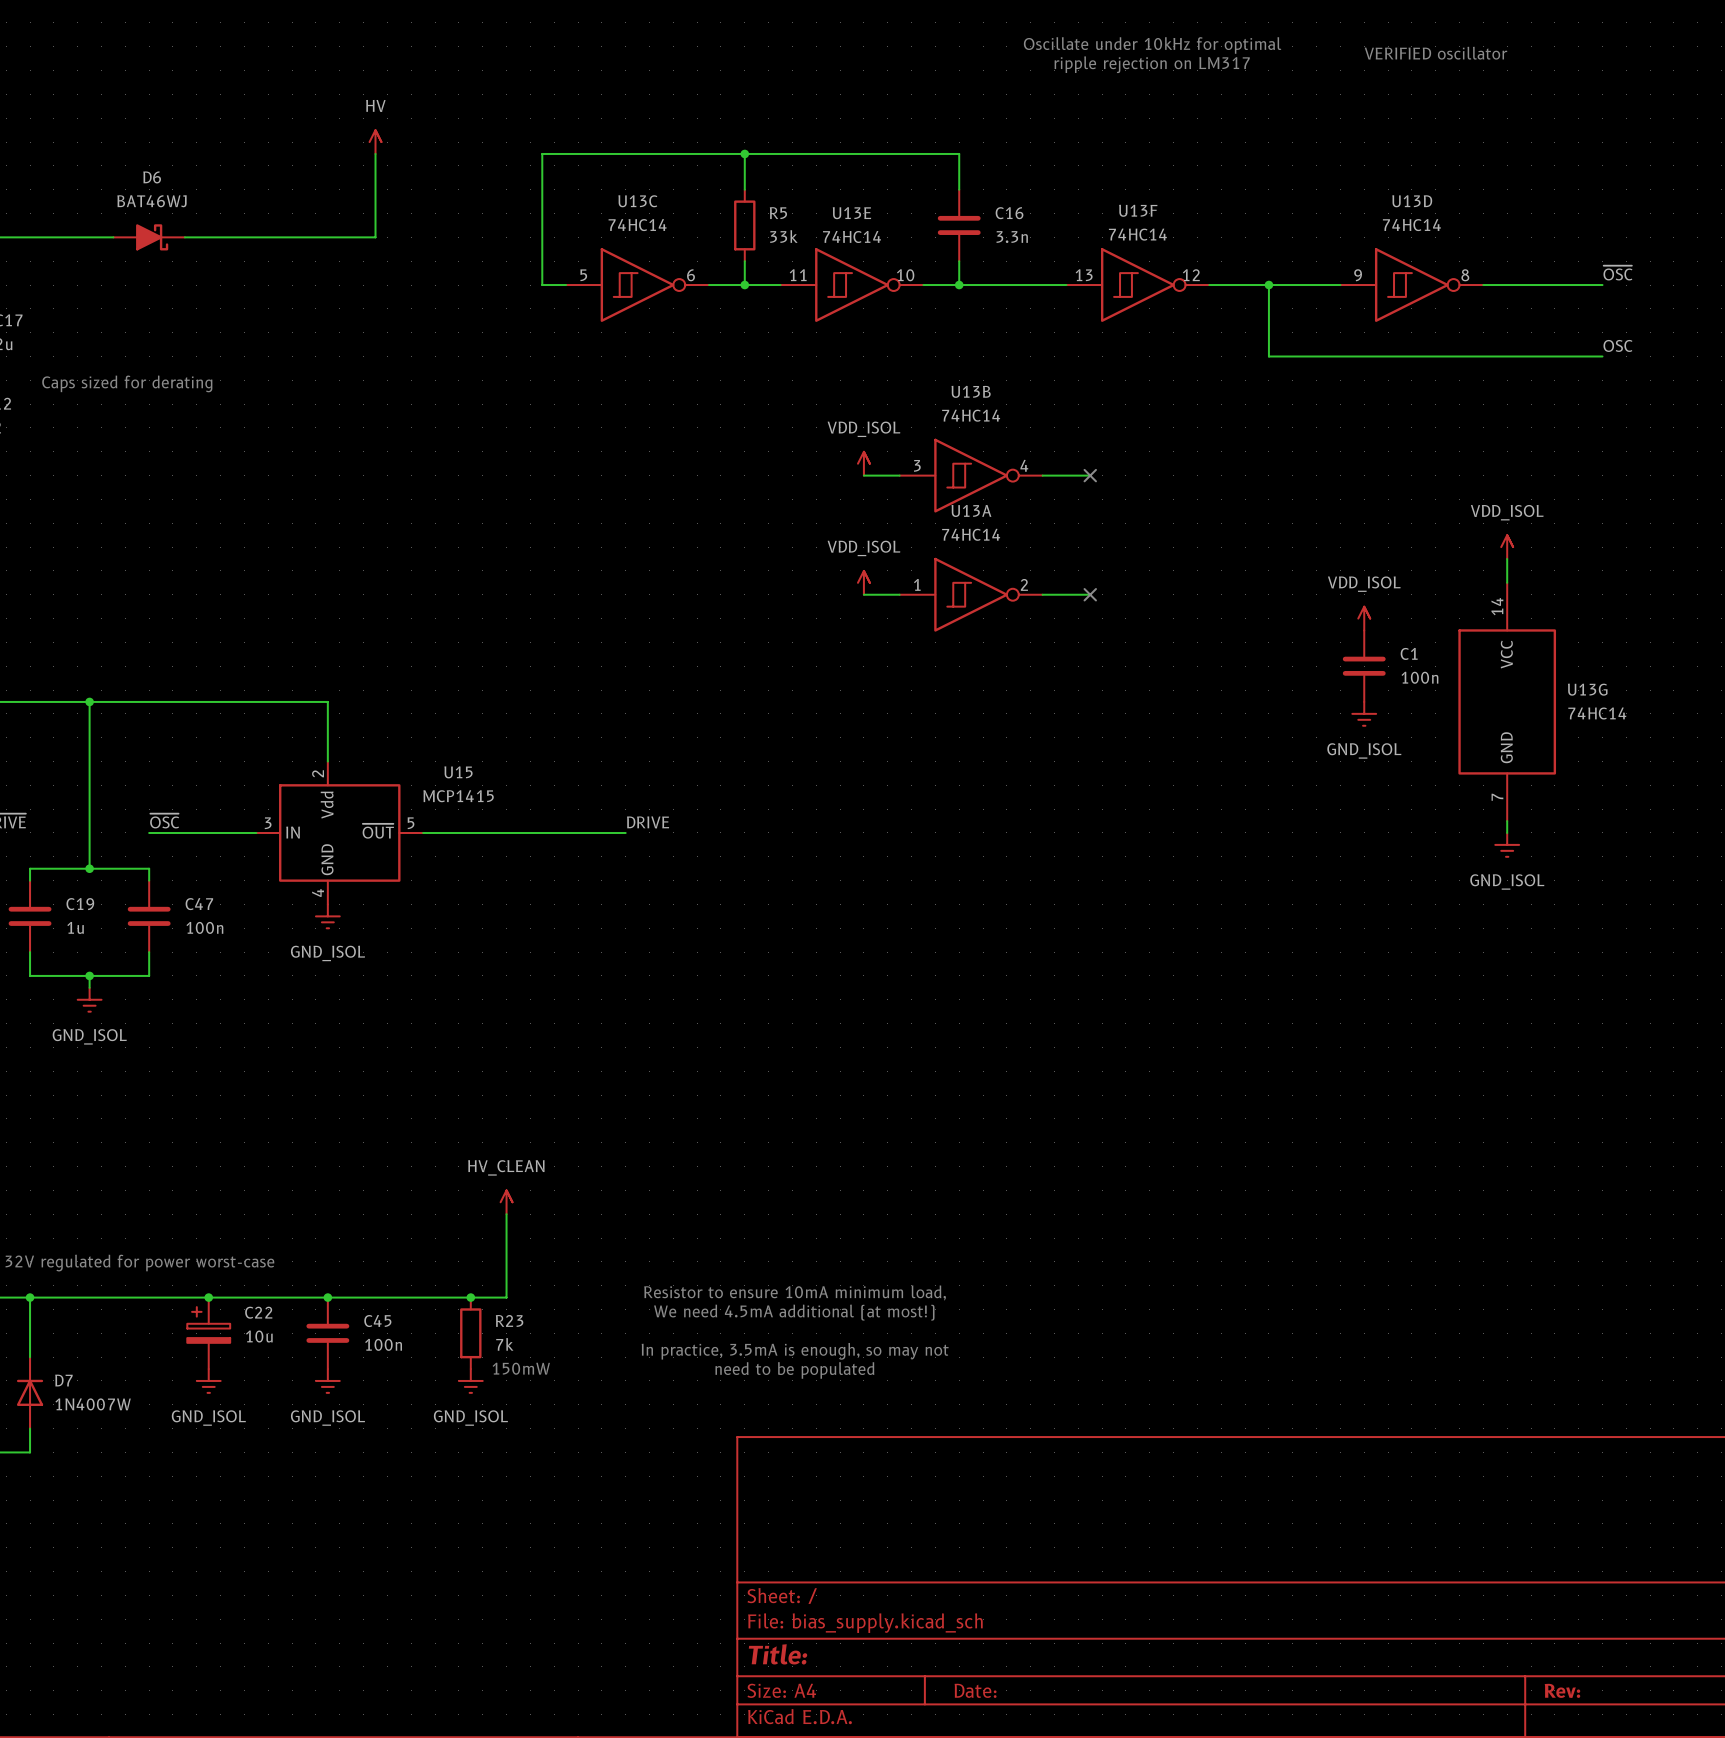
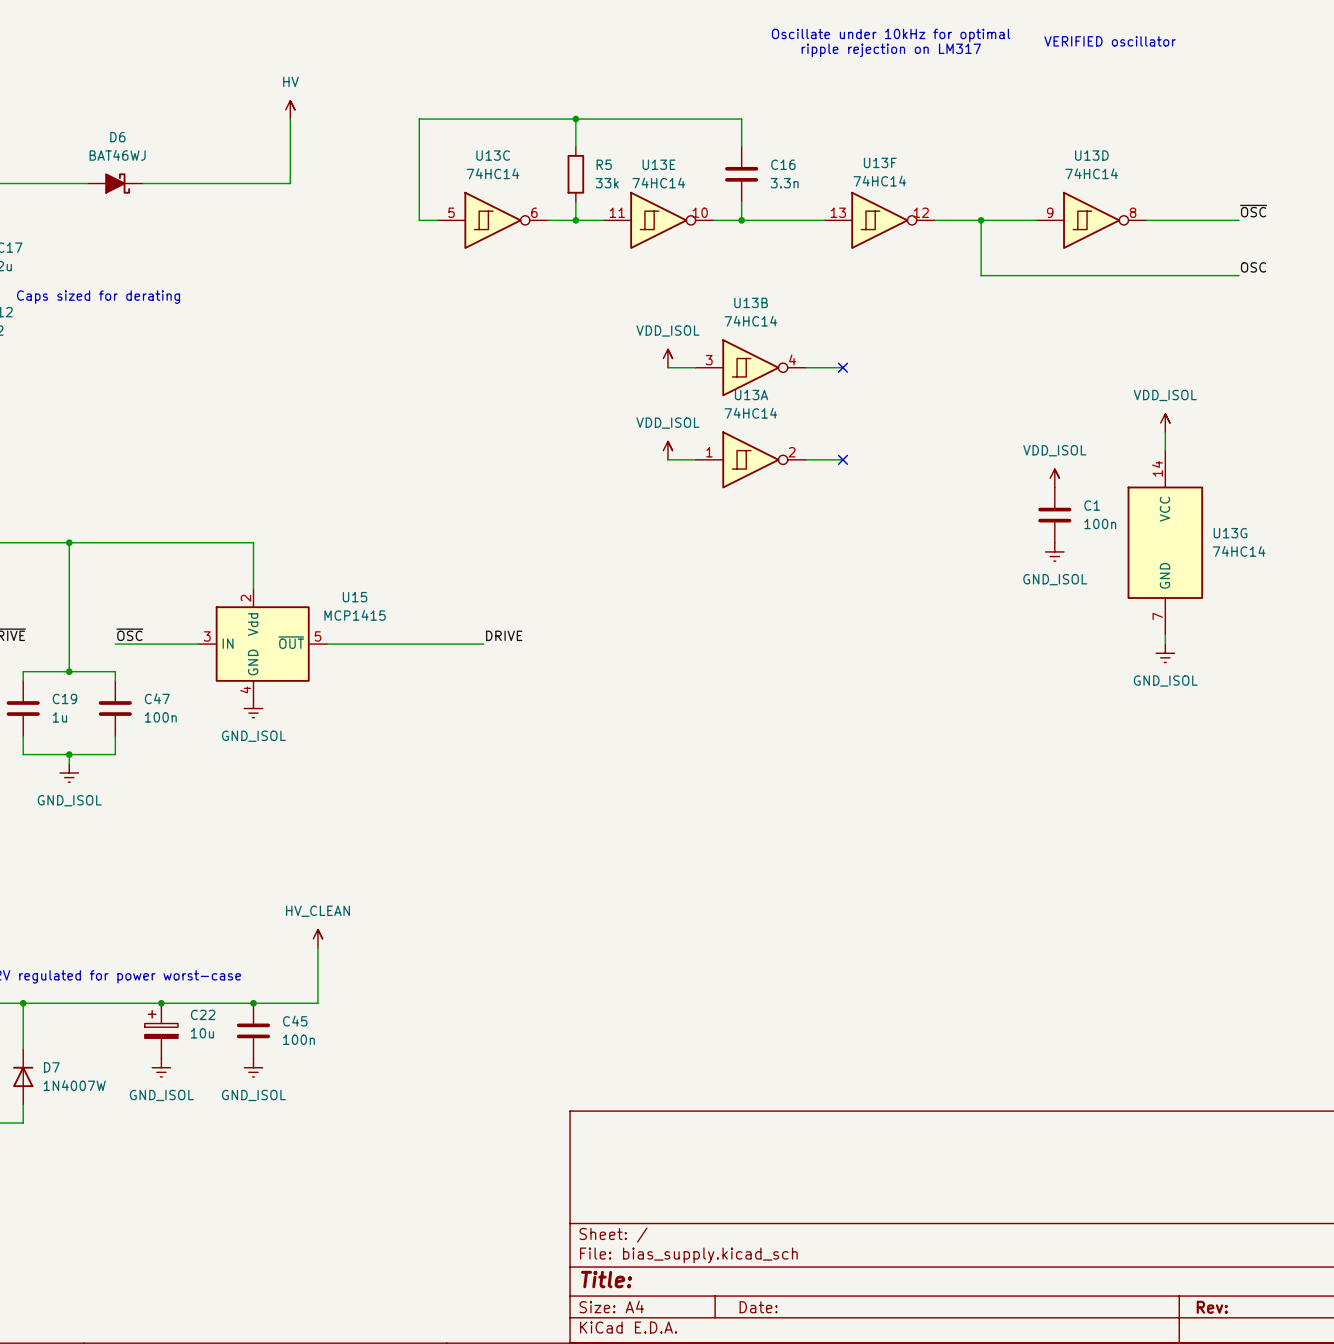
power symbol position: HV_CLEAN (506, 1202) -> HV_CLEAN (317, 938)
wire: (506, 1214) (506, 1297) (411, 1297) -> (317, 948) (317, 1003)
text: Resistor to ensure 10mA minimum load, (795, 1292) -> none
junction: (470, 1297) -> none
text: We need 4.5mA additional (at most!) (794, 1312) -> none
R23: 7k (470, 1333) -> none
text: In practice, 3.5mA is enough, so may not (795, 1351) -> none
text: 150mW (521, 1368) -> none
text: need to be populated (794, 1370) -> none
power symbol: GND_ISOL (470, 1380) -> none

